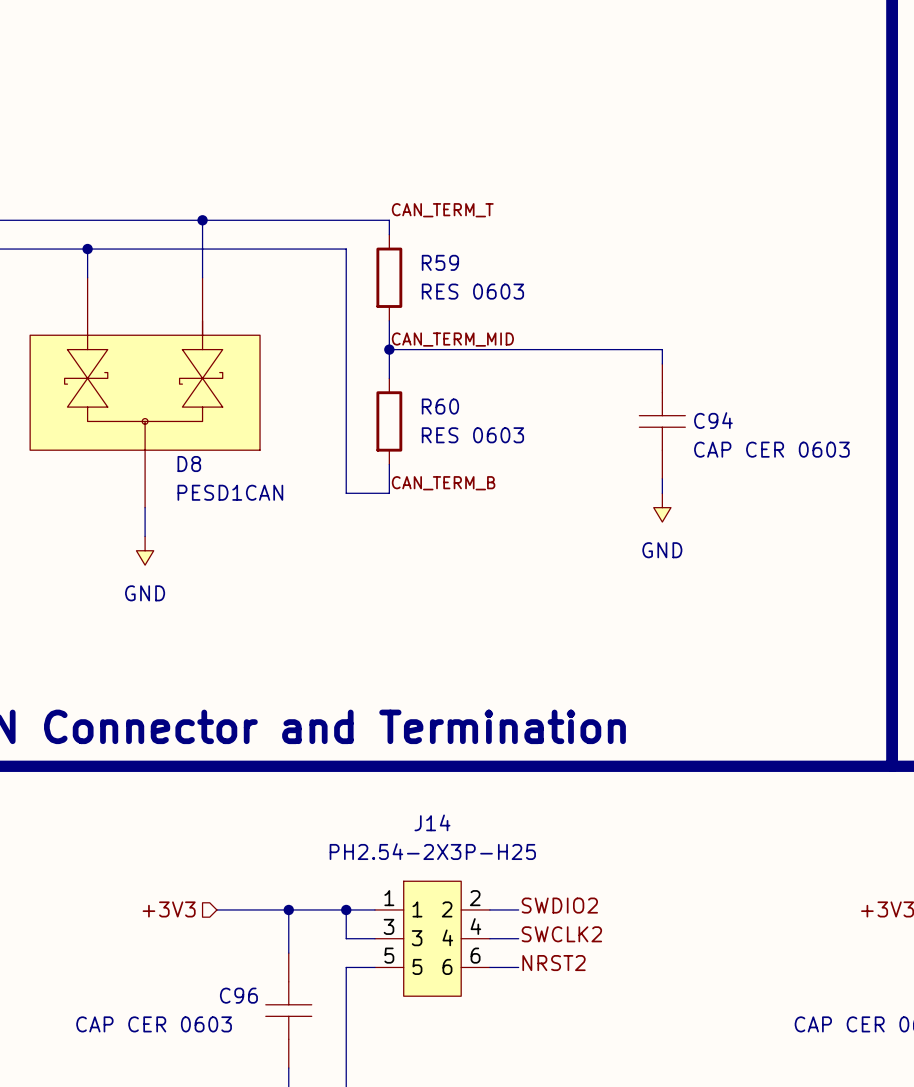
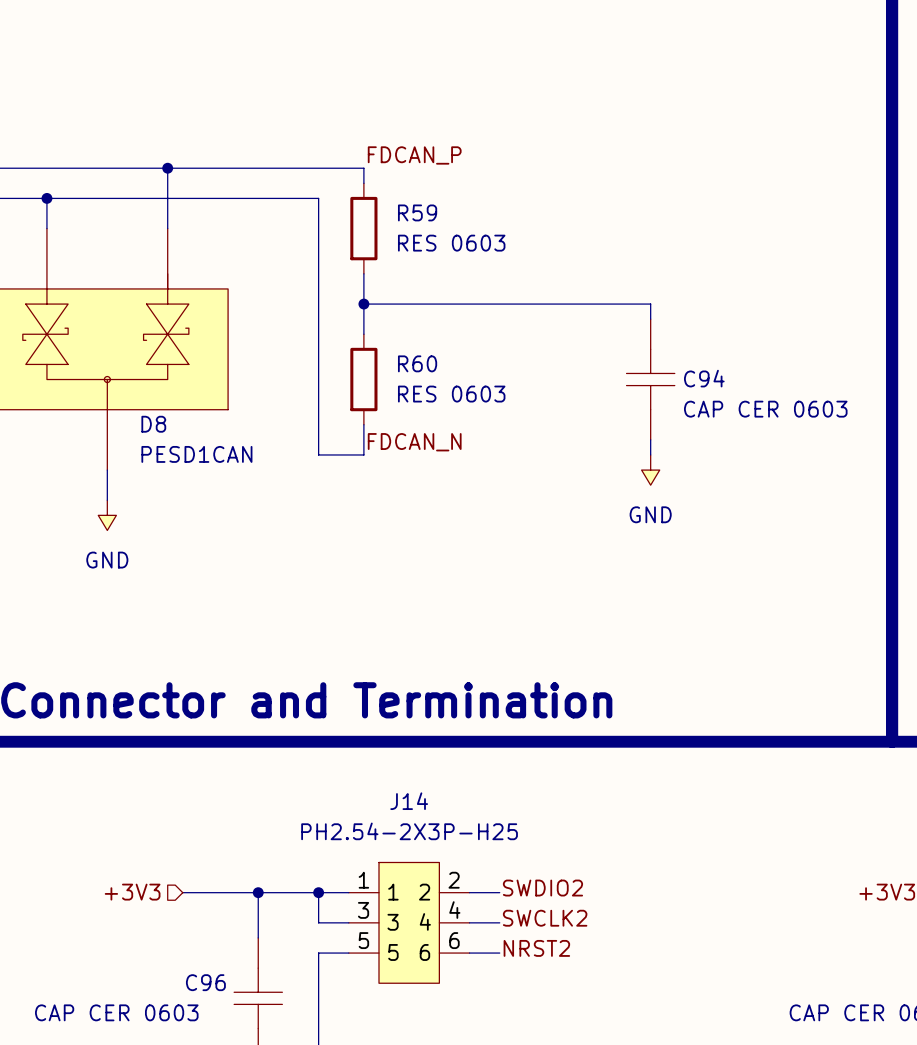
label: CAN_TERM_T (442, 210) -> FDCAN_P (414, 155)
label: CAN_TERM_MID (452, 339) -> none
label: CAN_TERM_B (443, 483) -> FDCAN_N (414, 442)

